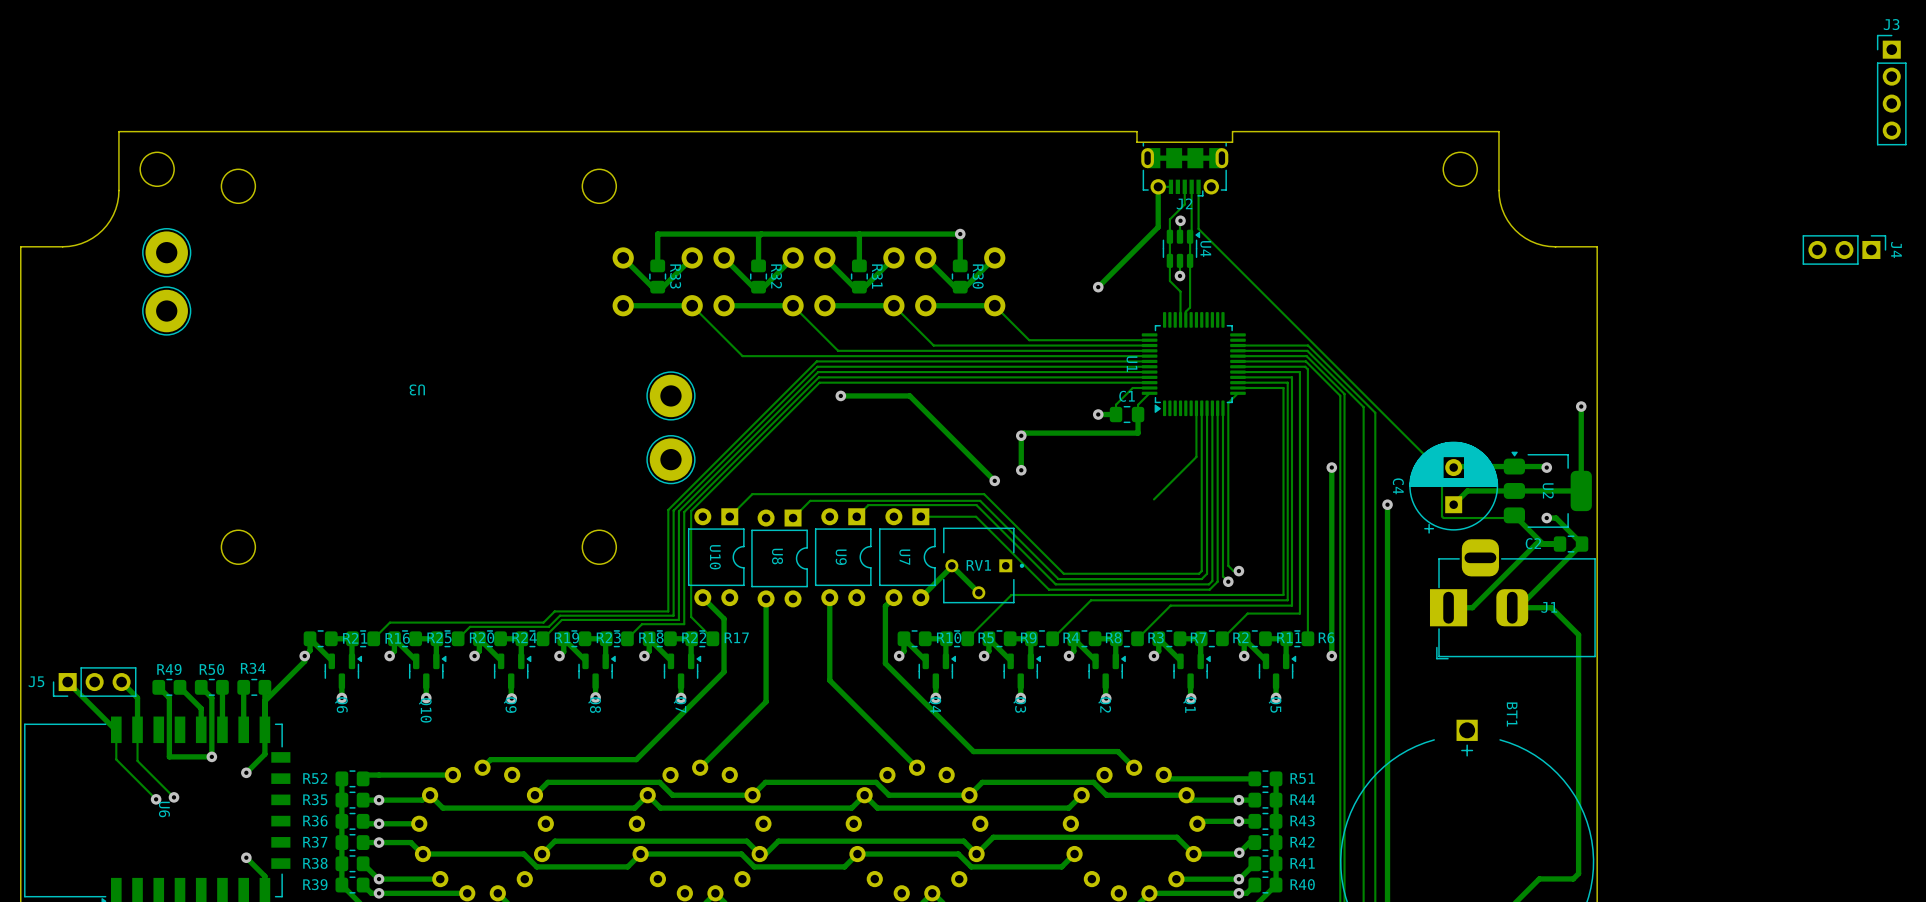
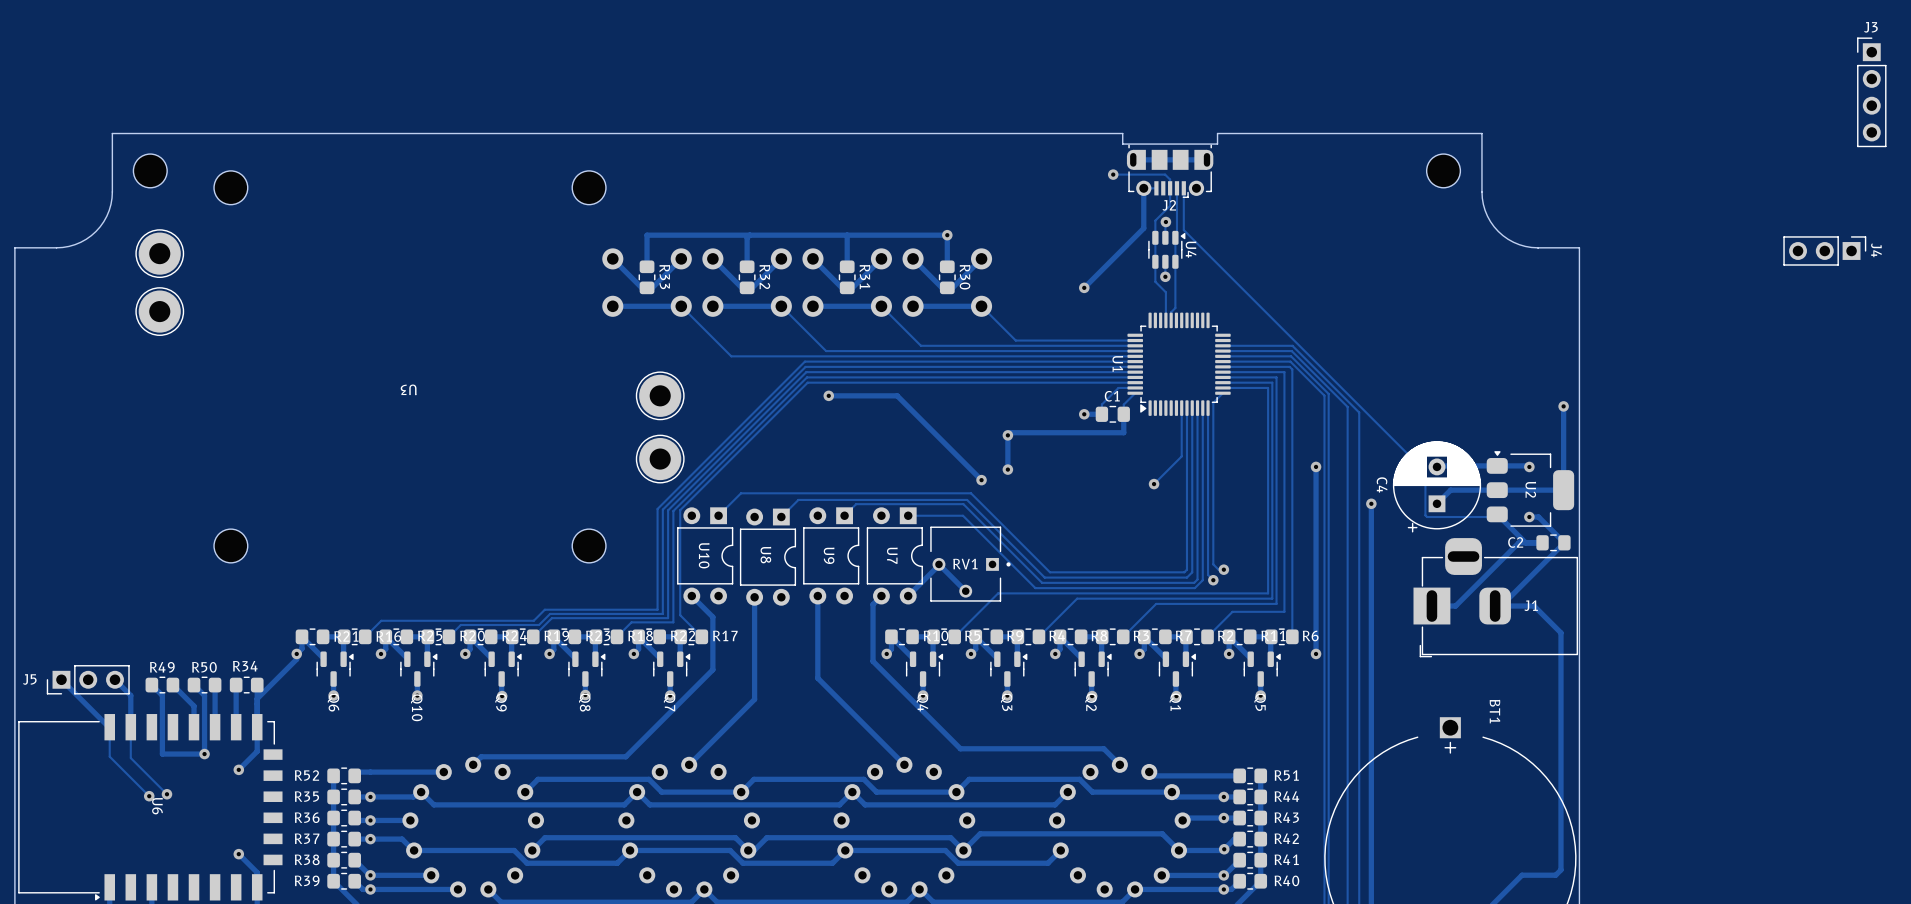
track: none -> (1113, 174) (1165, 174) (1170, 179) (1170, 188)
via: none -> (1113, 174)
via: none -> (1154, 484)
track: (1167, 486) (1153, 499) -> none

